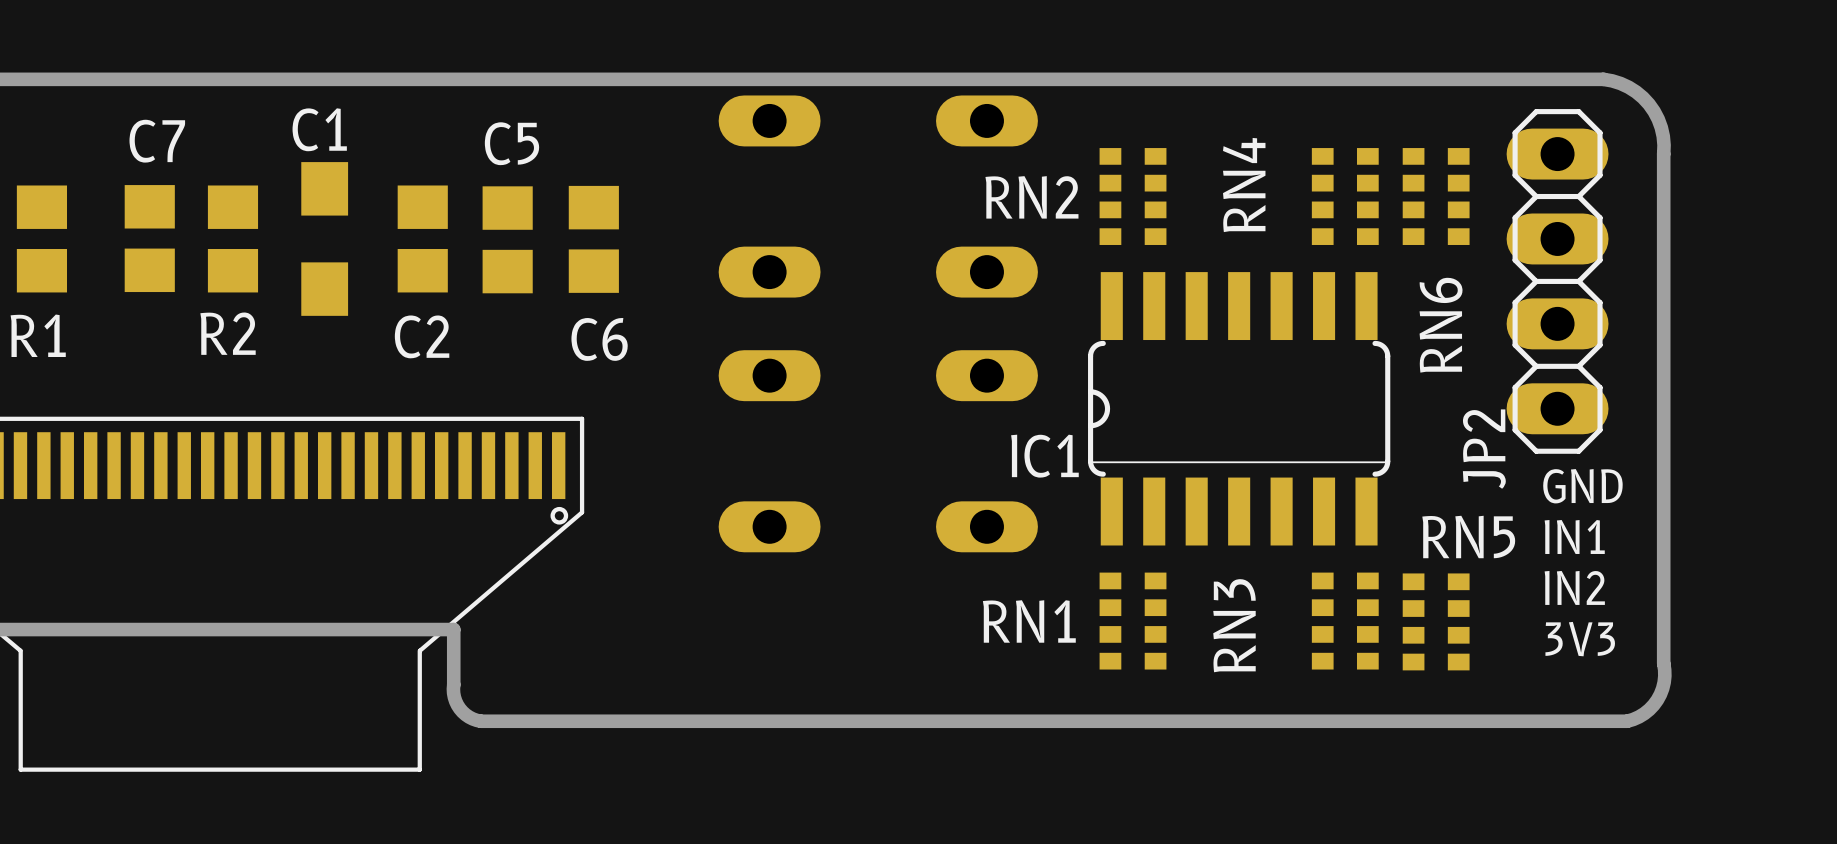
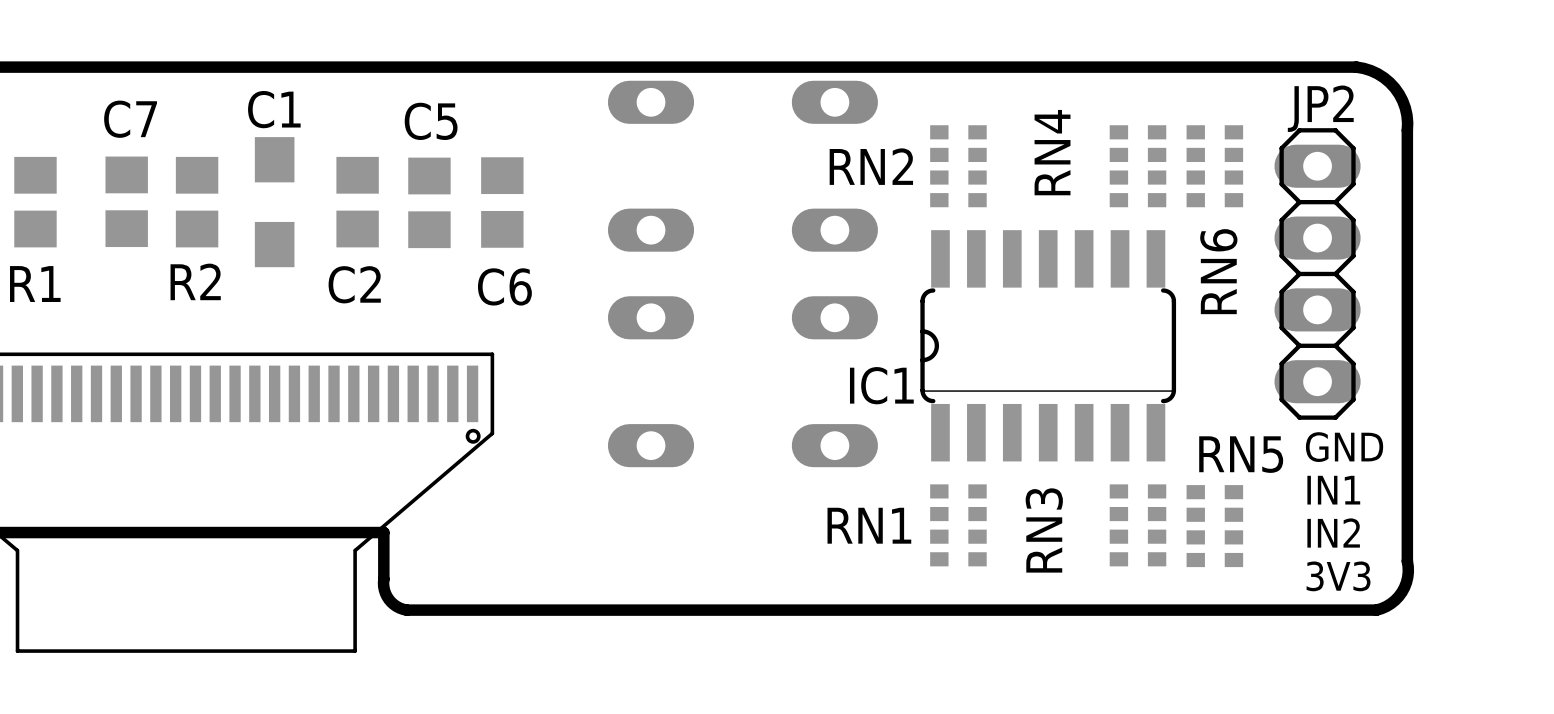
JP2 position: (1557, 281) -> (1317, 273)
JP2 name rotation: 0° (1484, 449) -> 90° clockwise (1320, 108)
JP2 name position: JP2 (1484, 449) -> JP2 (1320, 108)
text: GND (1582, 486) -> none
text: IN1 (1574, 537) -> GND (1344, 447)
text: IN2 (1574, 587) -> IN1 (1333, 490)
text: 3V3 (1580, 639) -> IN2 (1333, 533)
text: none -> 3V3 (1338, 576)

